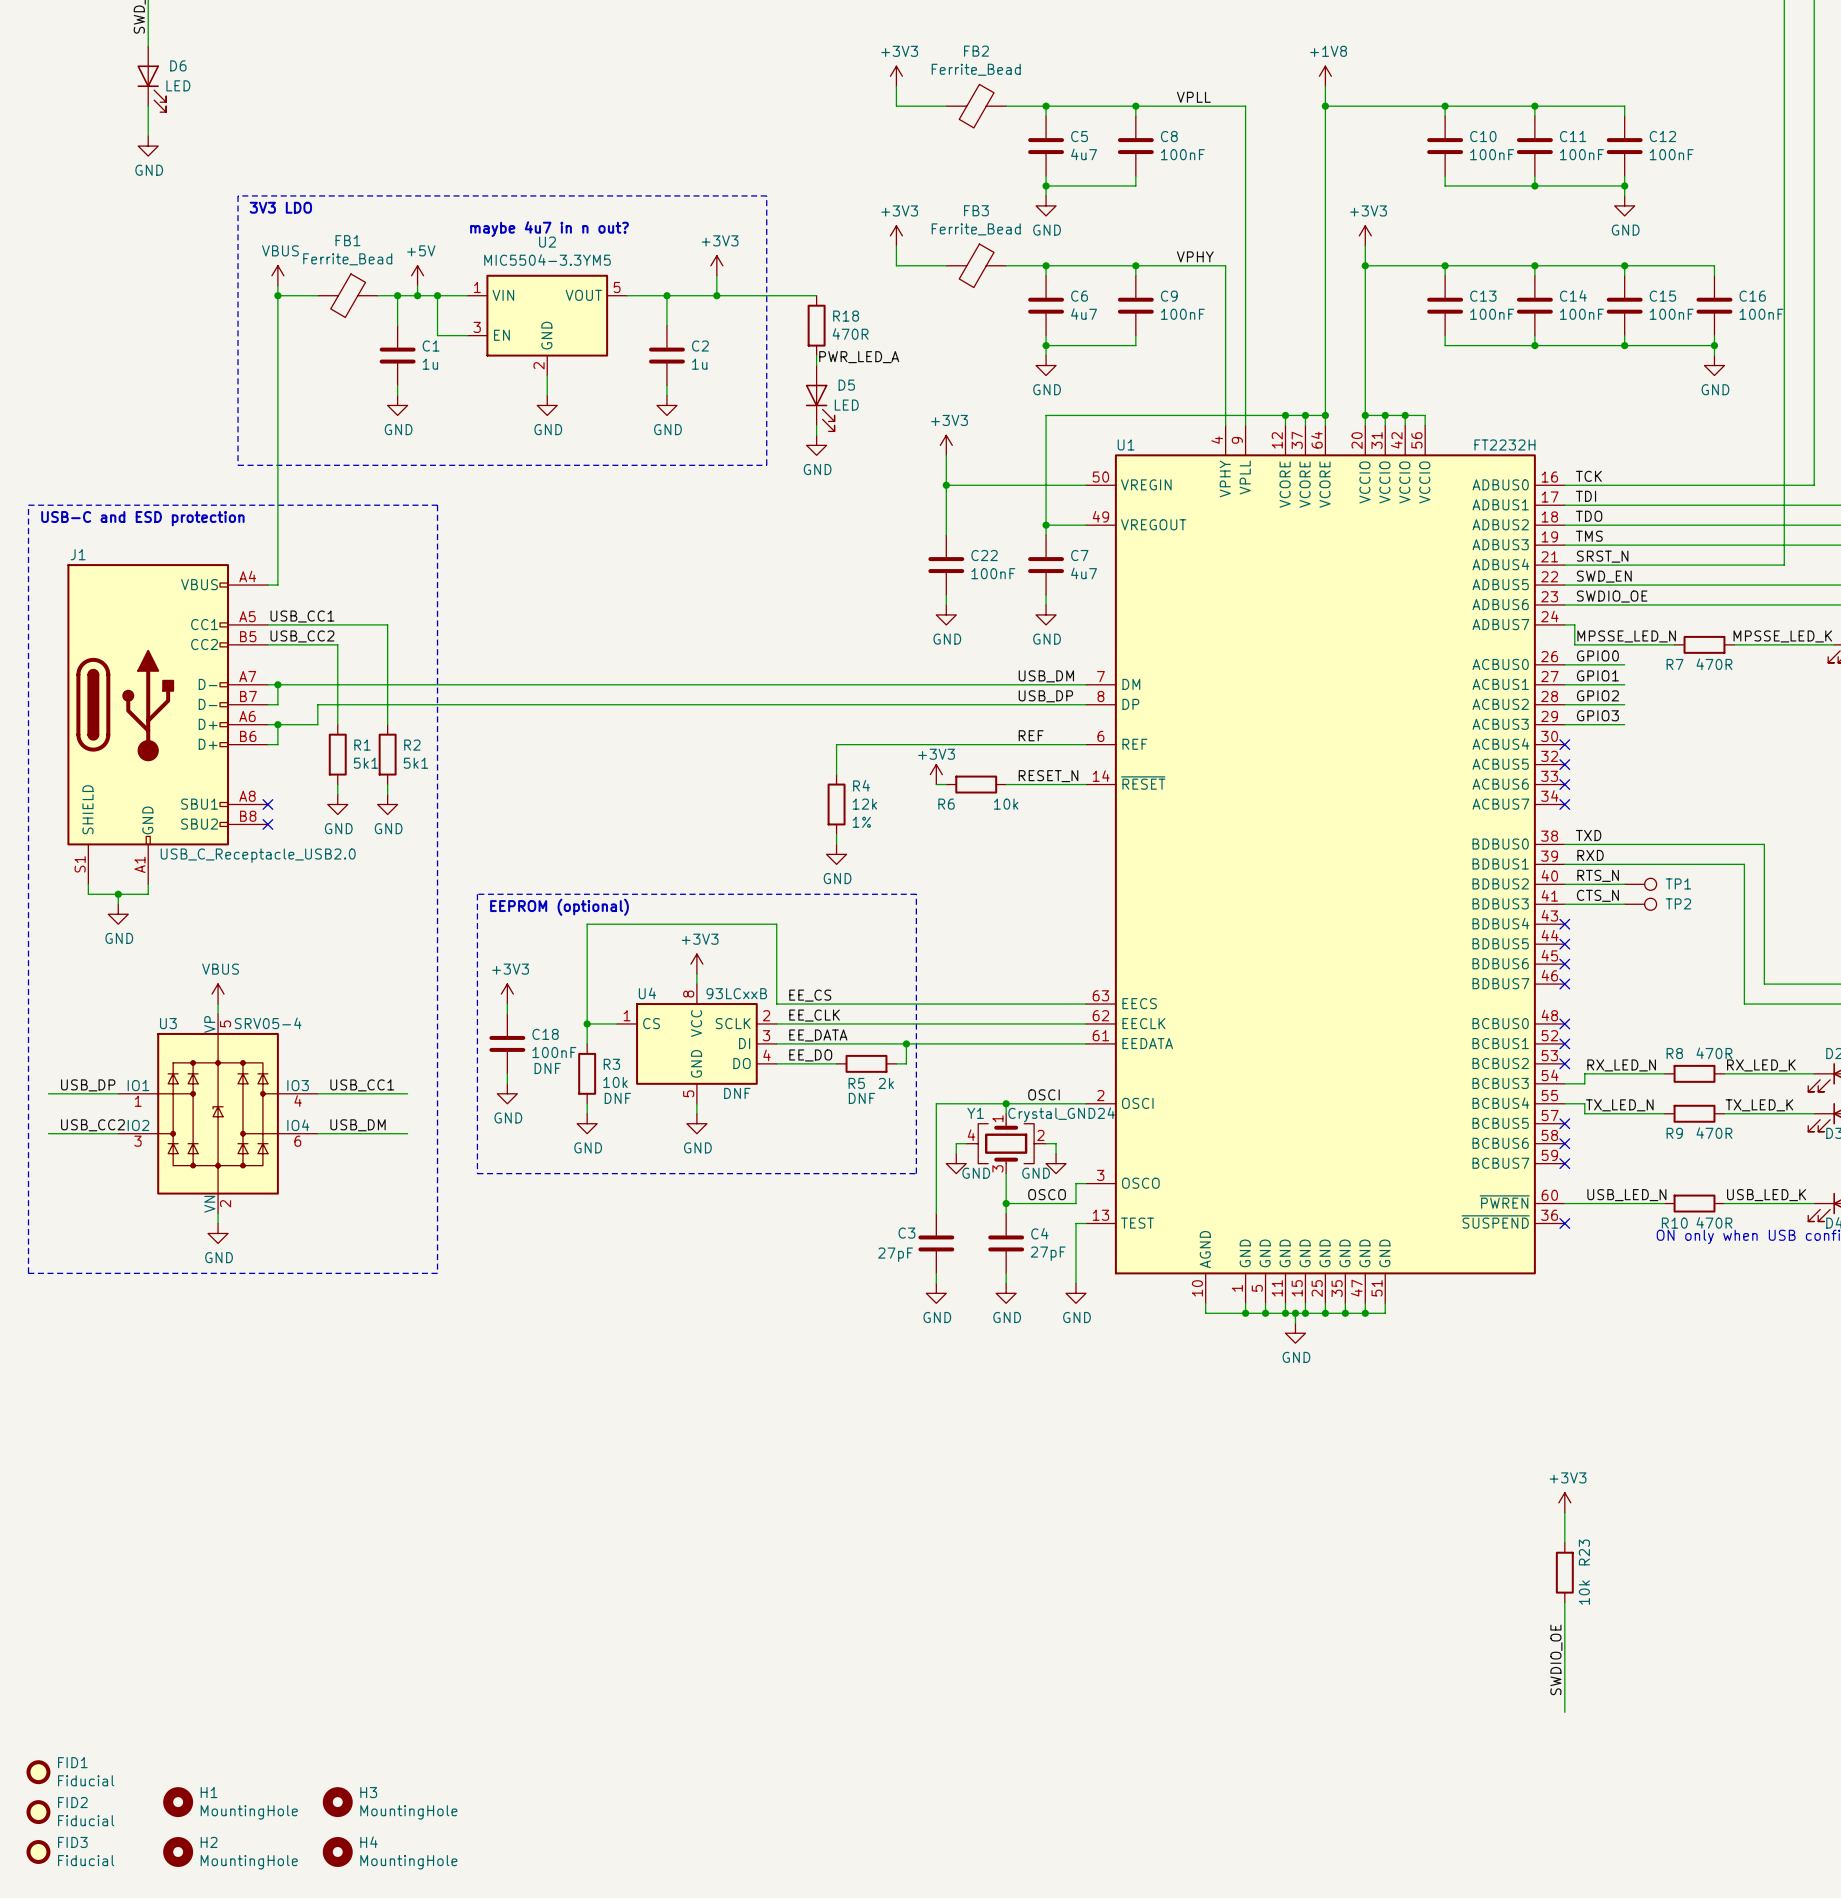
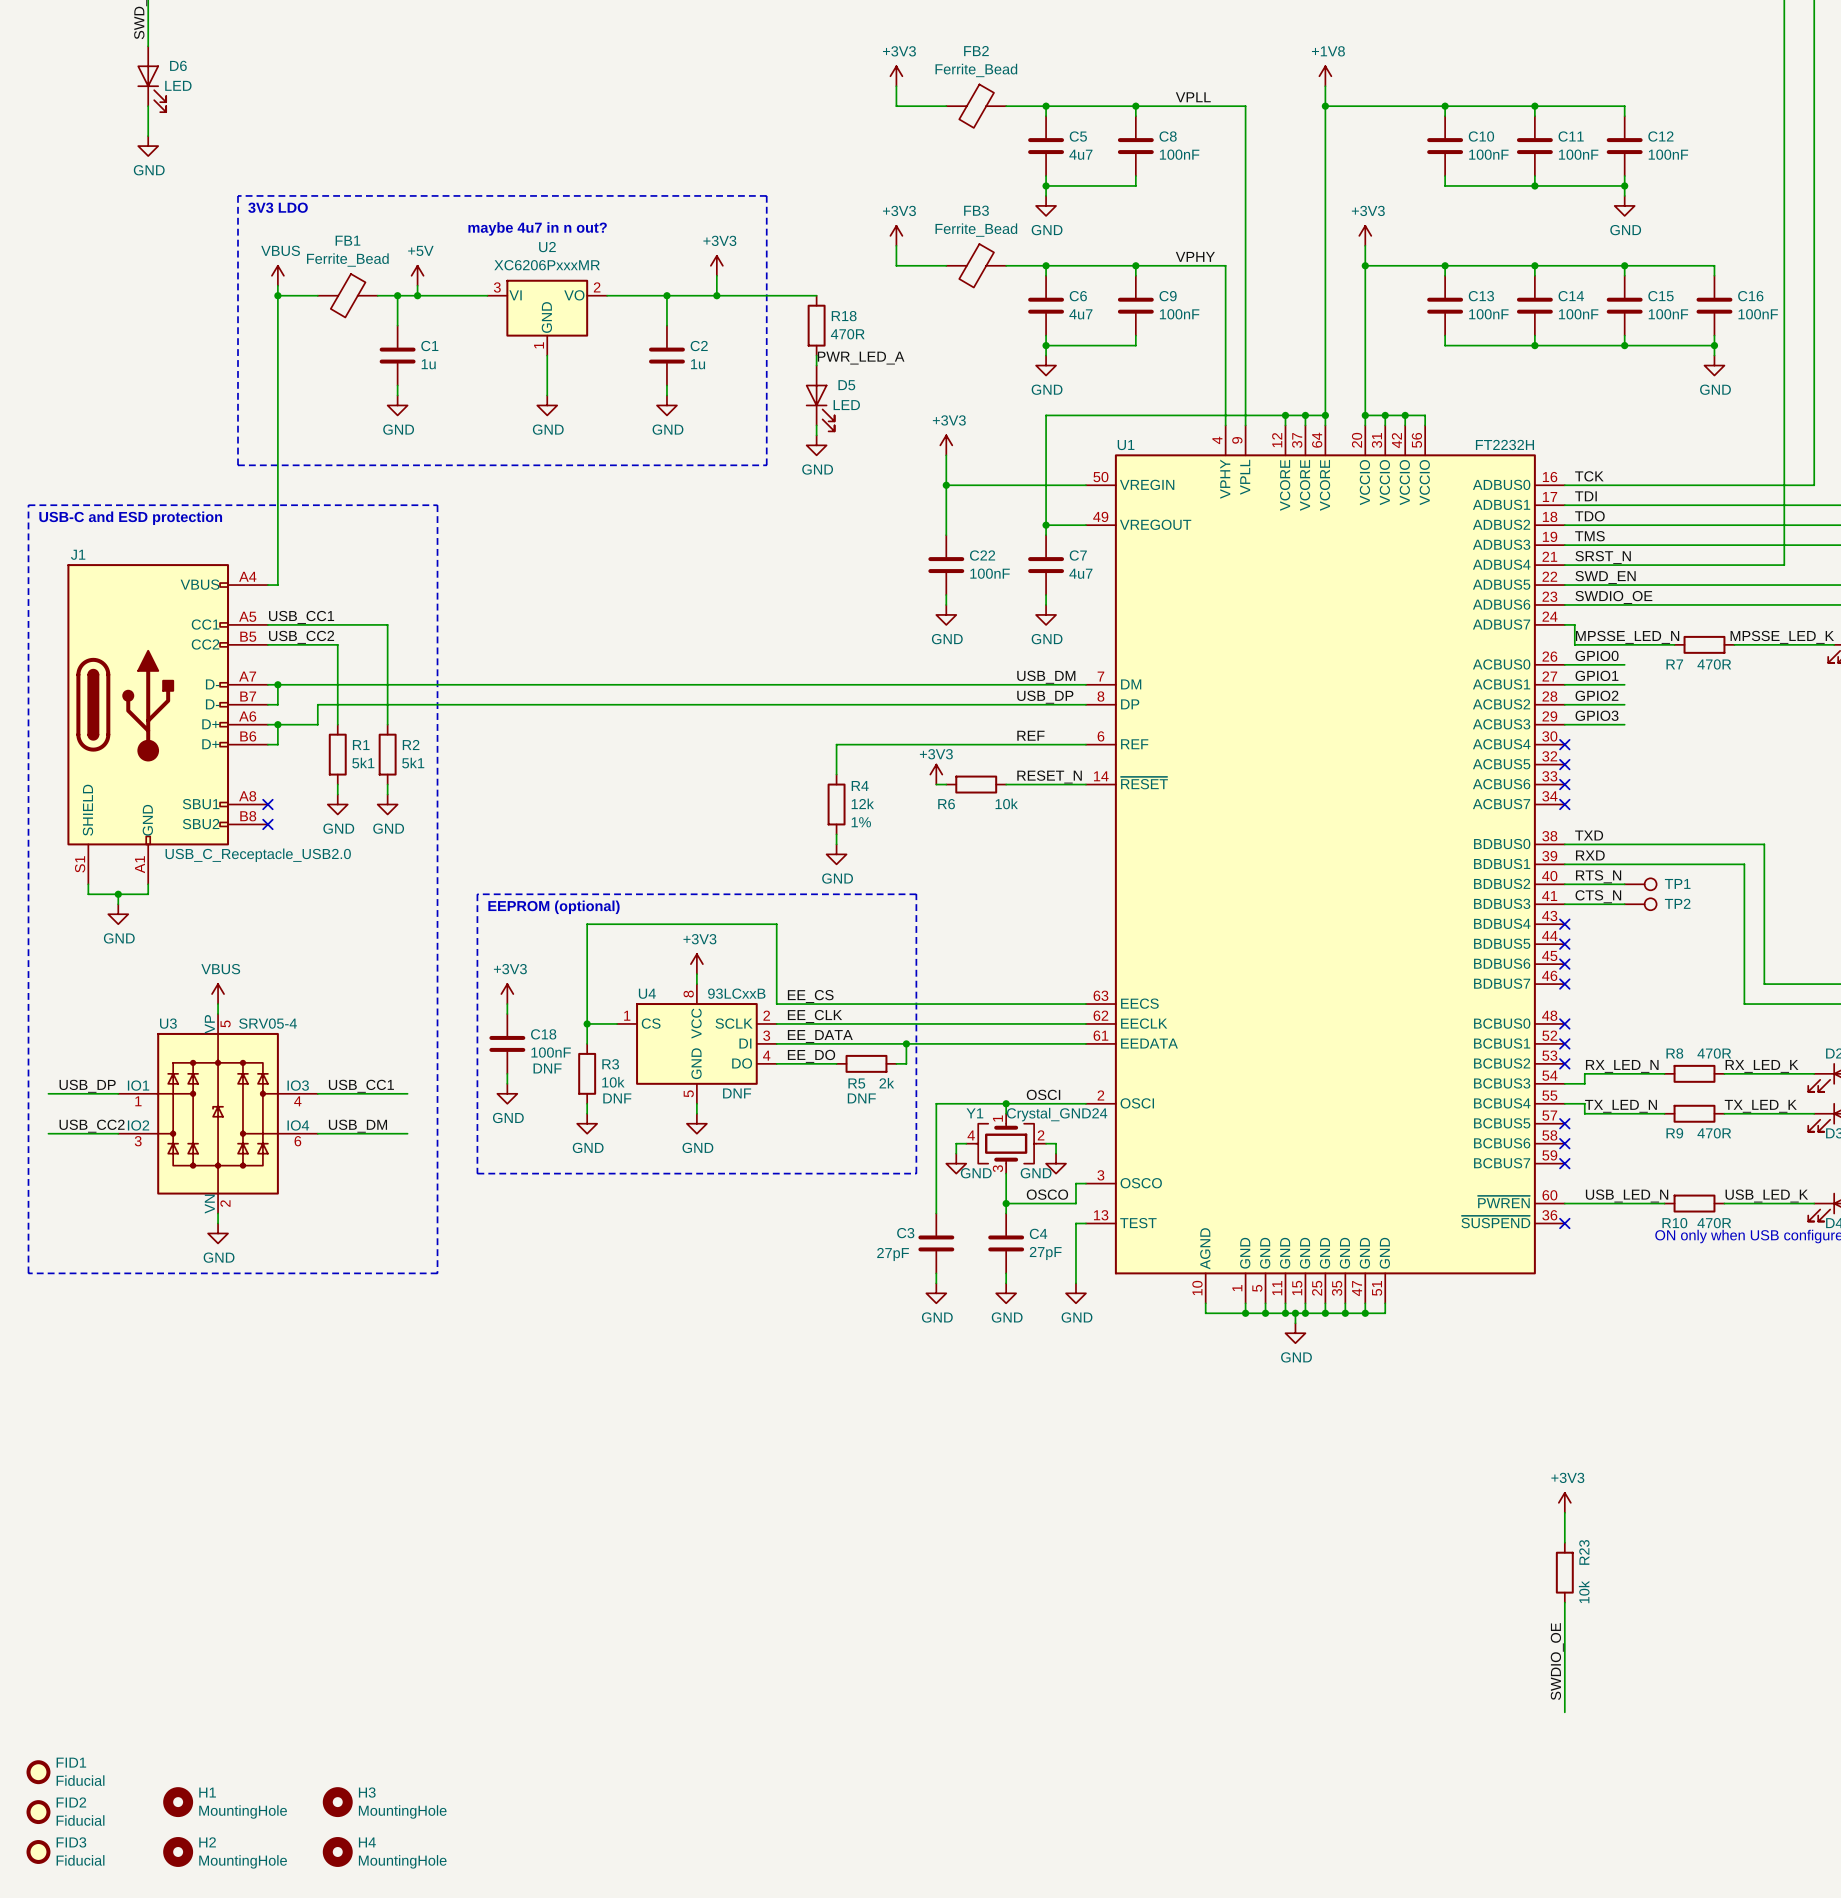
U2 value: MIC5504-3.3YM5 (547, 259) -> XC6206PxxxMR (547, 265)
U2 symbol: [467, 274, 628, 376] -> [487, 279, 608, 356]
wire: (437, 295) (437, 335) (467, 335) -> none
junction: (437, 295) -> none

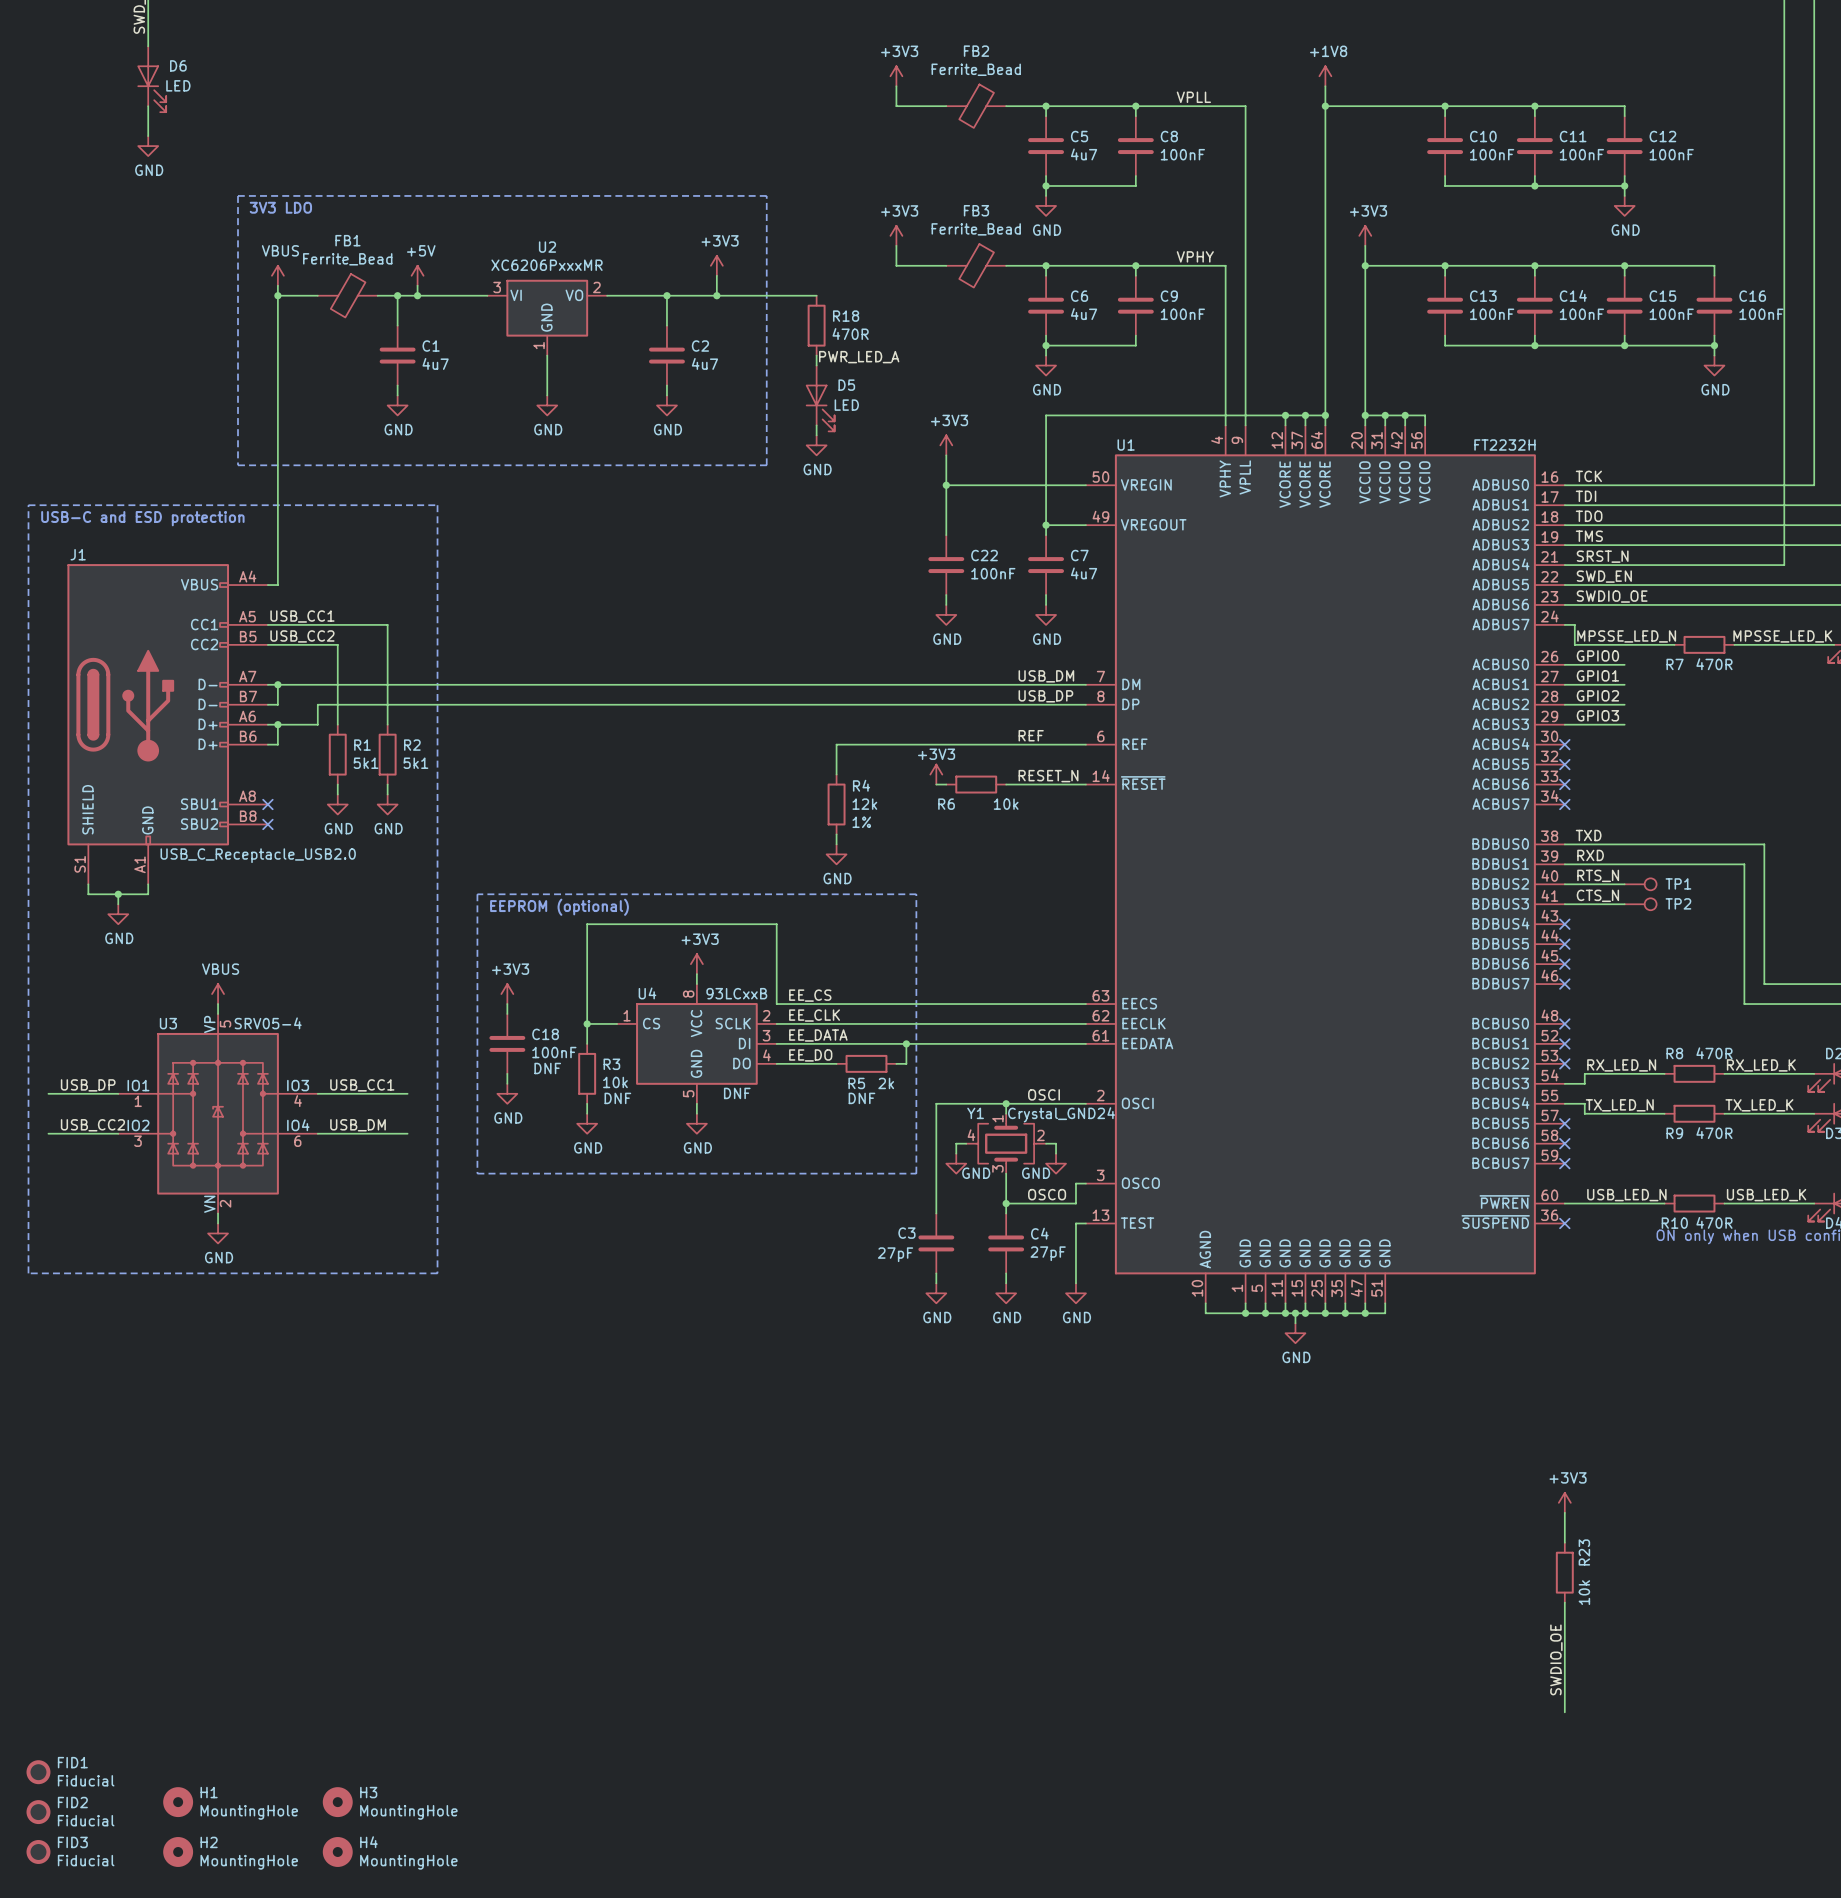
text: maybe 4u7 in n out? (537, 228) -> none
C1 value: 1u (428, 364) -> 4u7 (435, 363)
C2 value: 1u (698, 364) -> 4u7 (704, 363)

